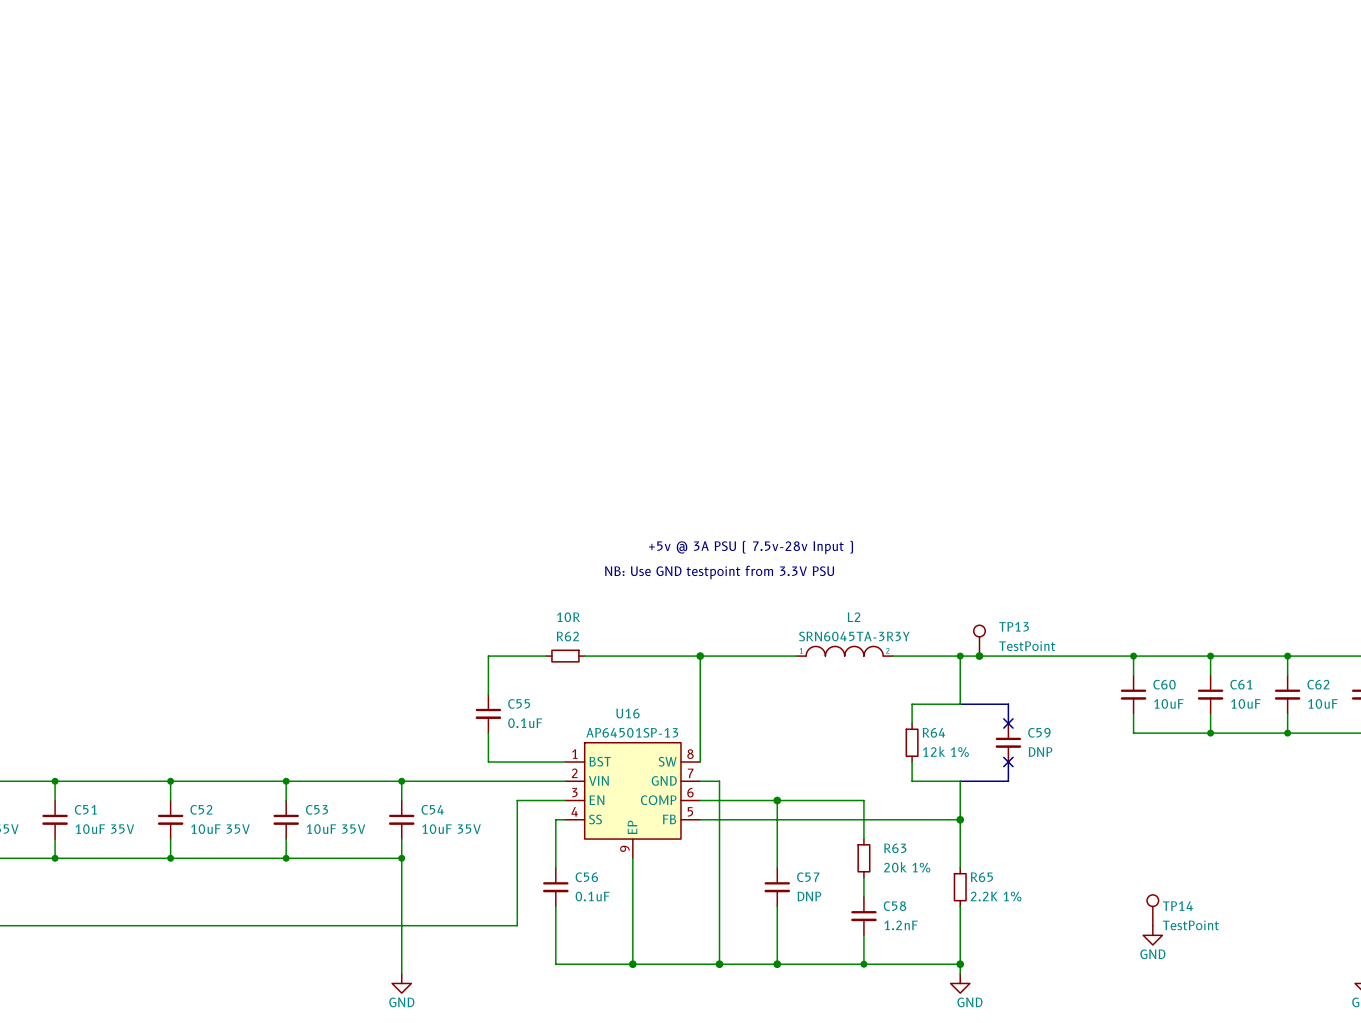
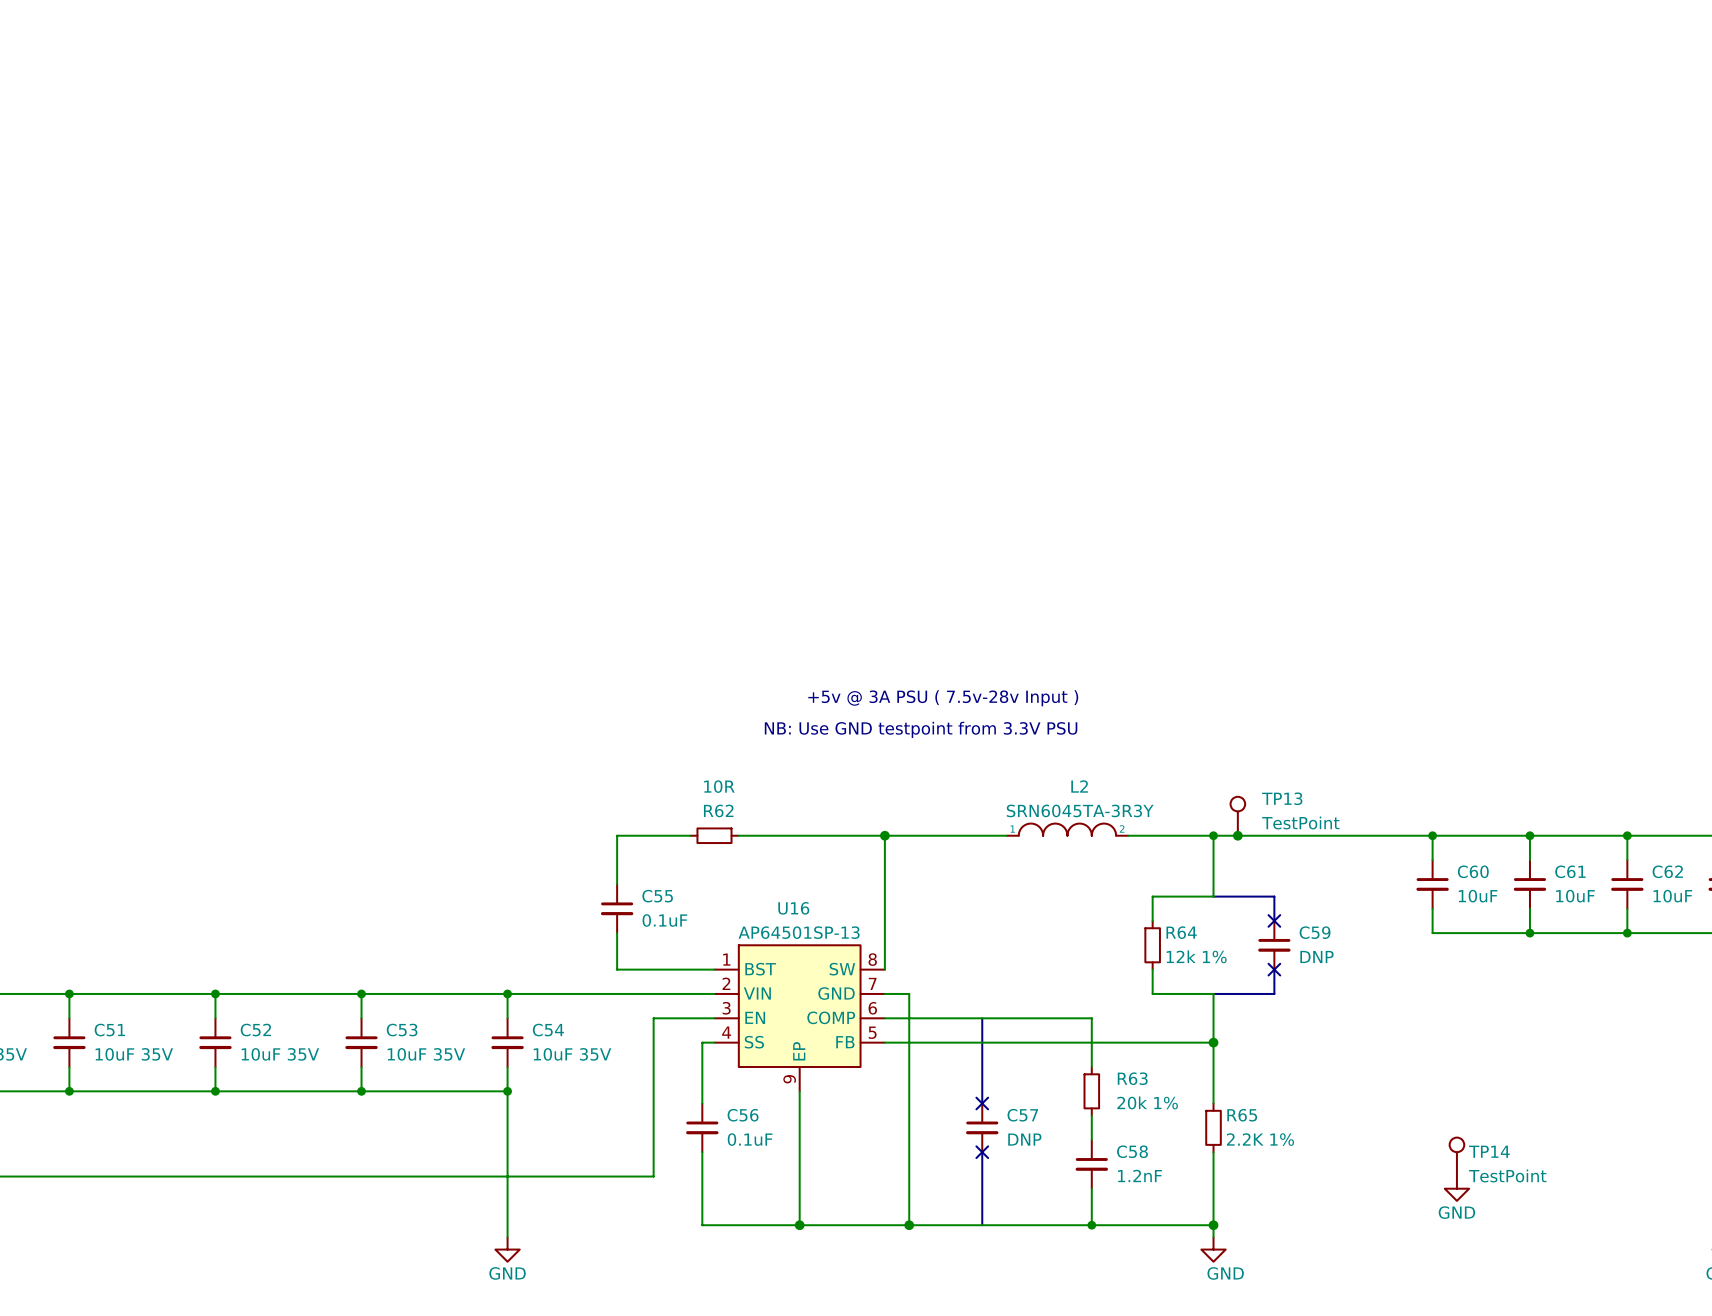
line: none -> (982, 1018) (982, 1103)
junction: (777, 800) -> none
no-connect mark: none -> (982, 1103)
line: none -> (982, 1152) (982, 1225)
no-connect mark: none -> (982, 1152)
junction: (777, 964) -> none

